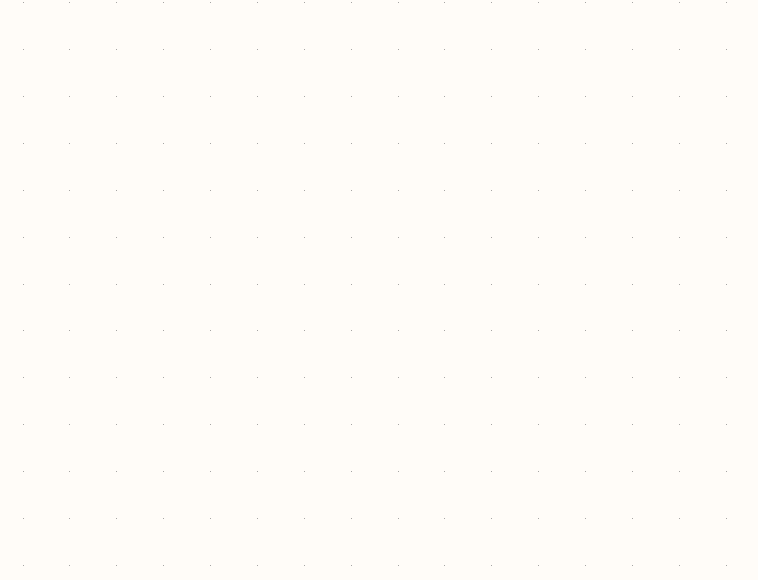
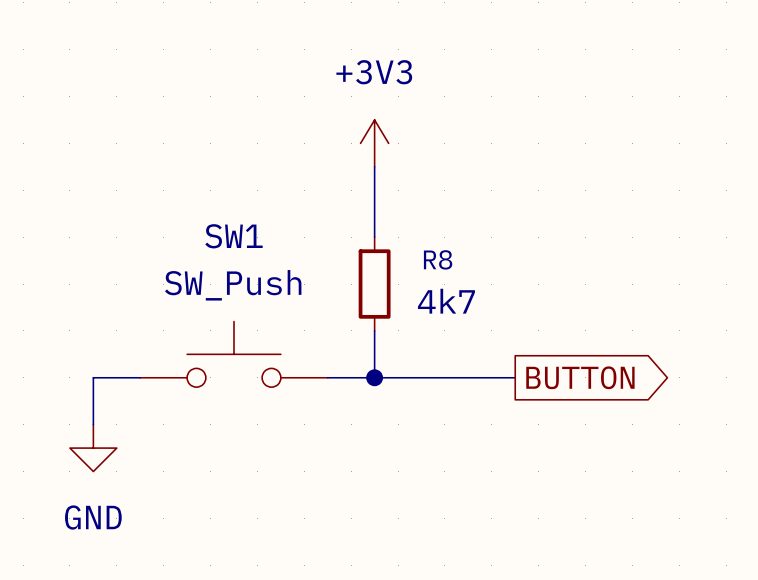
power symbol: none -> +3V3 (374, 143)
wire: none -> (374, 166) (374, 237)
R8: none -> 4k7 (374, 284)
wire: none -> (374, 330) (374, 377)
SW1: none -> SW_Push (233, 354)
wire: none -> (140, 377) (93, 377) (93, 424)
wire: none -> (327, 377) (515, 377)
junction: none -> (374, 377)
global label: none -> BUTTON (580, 377)
power symbol: none -> GND (93, 448)

